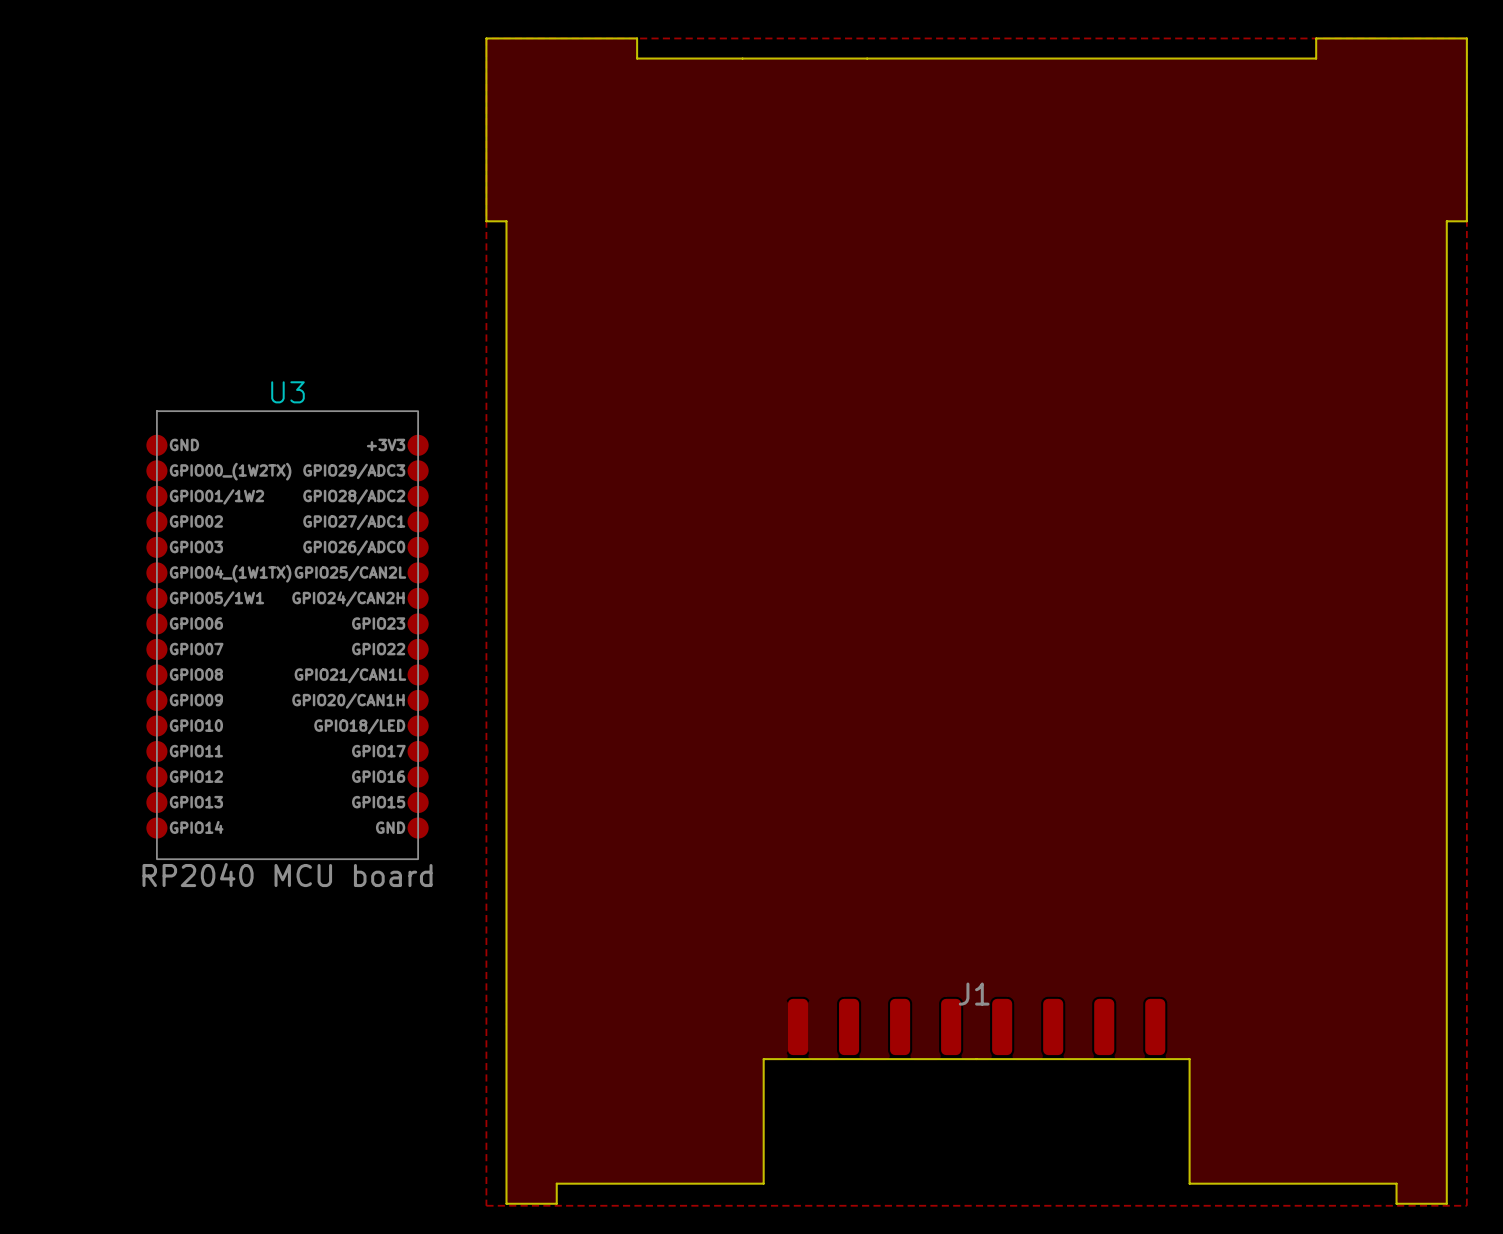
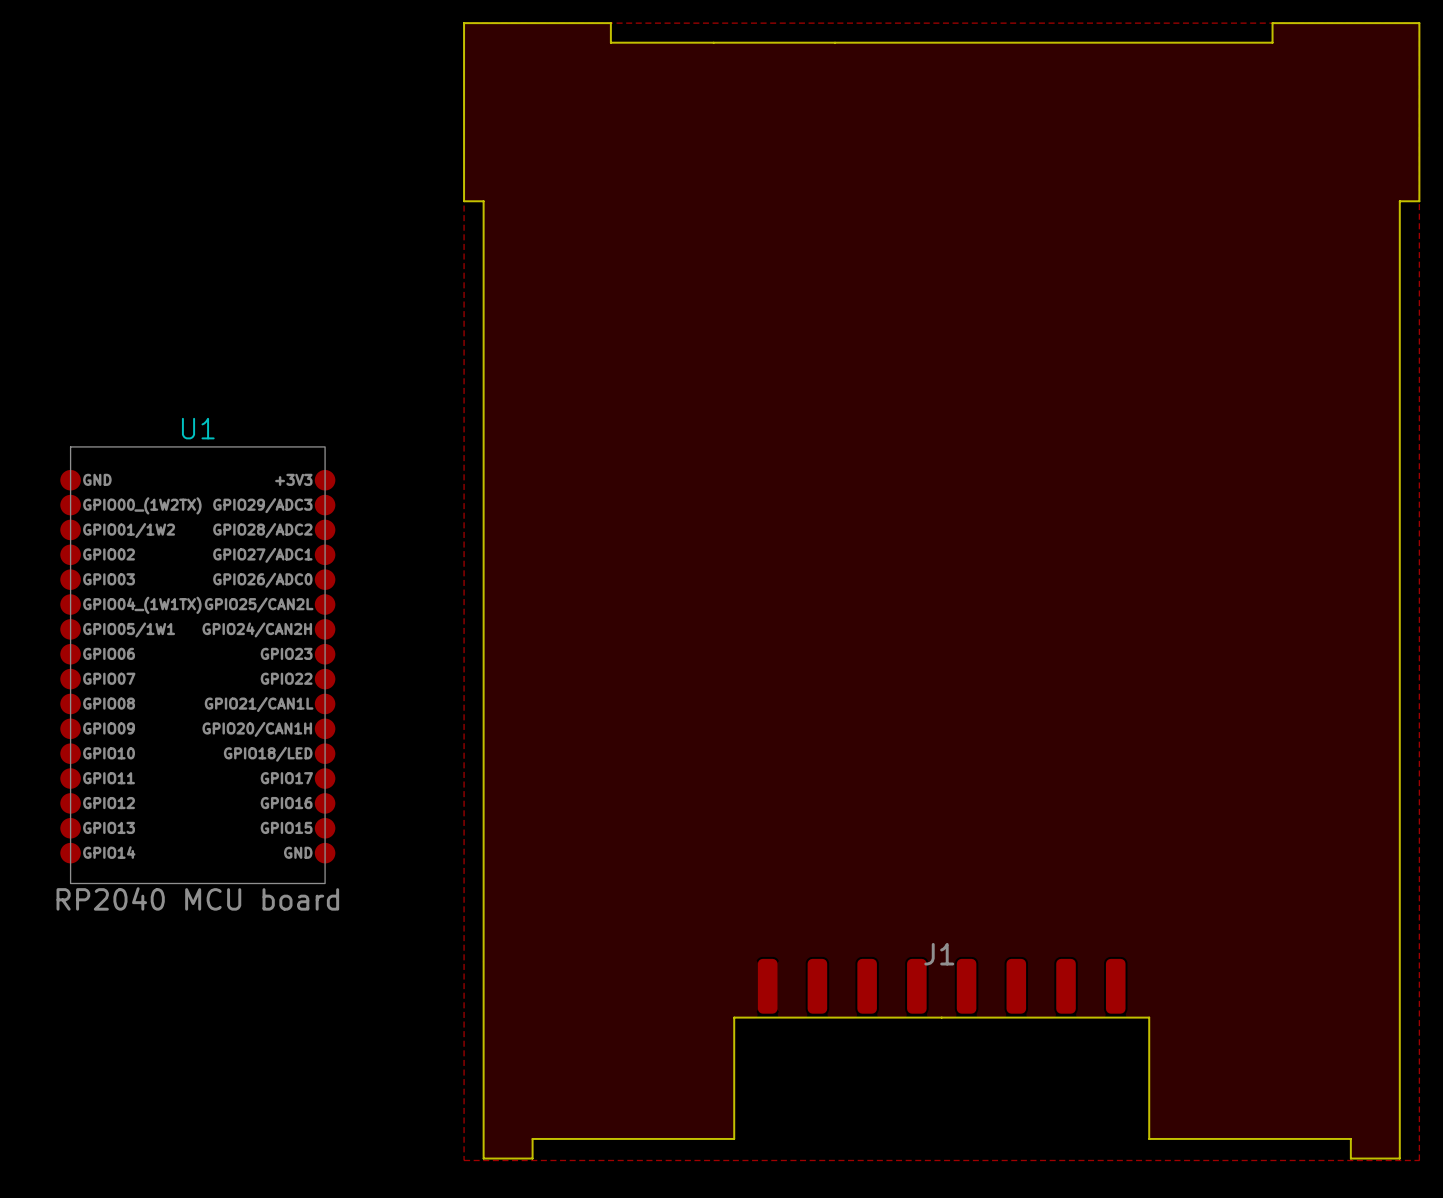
U3: RP2040 MCU board (287, 635) -> none
U1: none -> RP2040 MCU board (197, 665)

